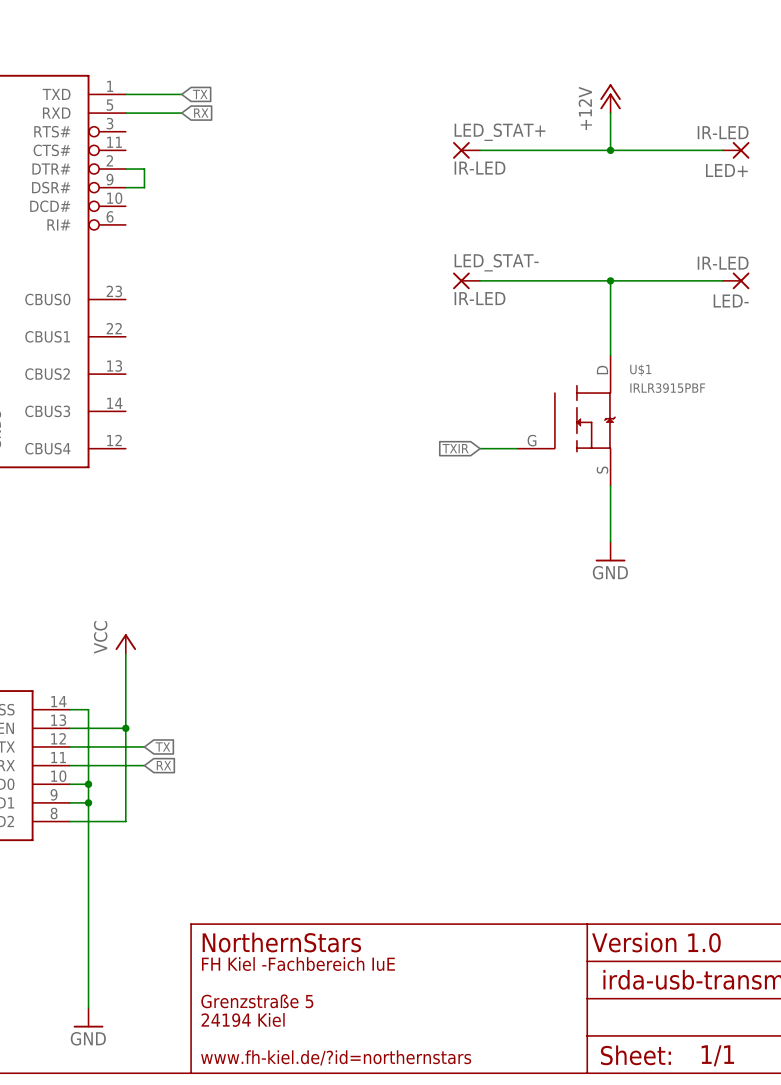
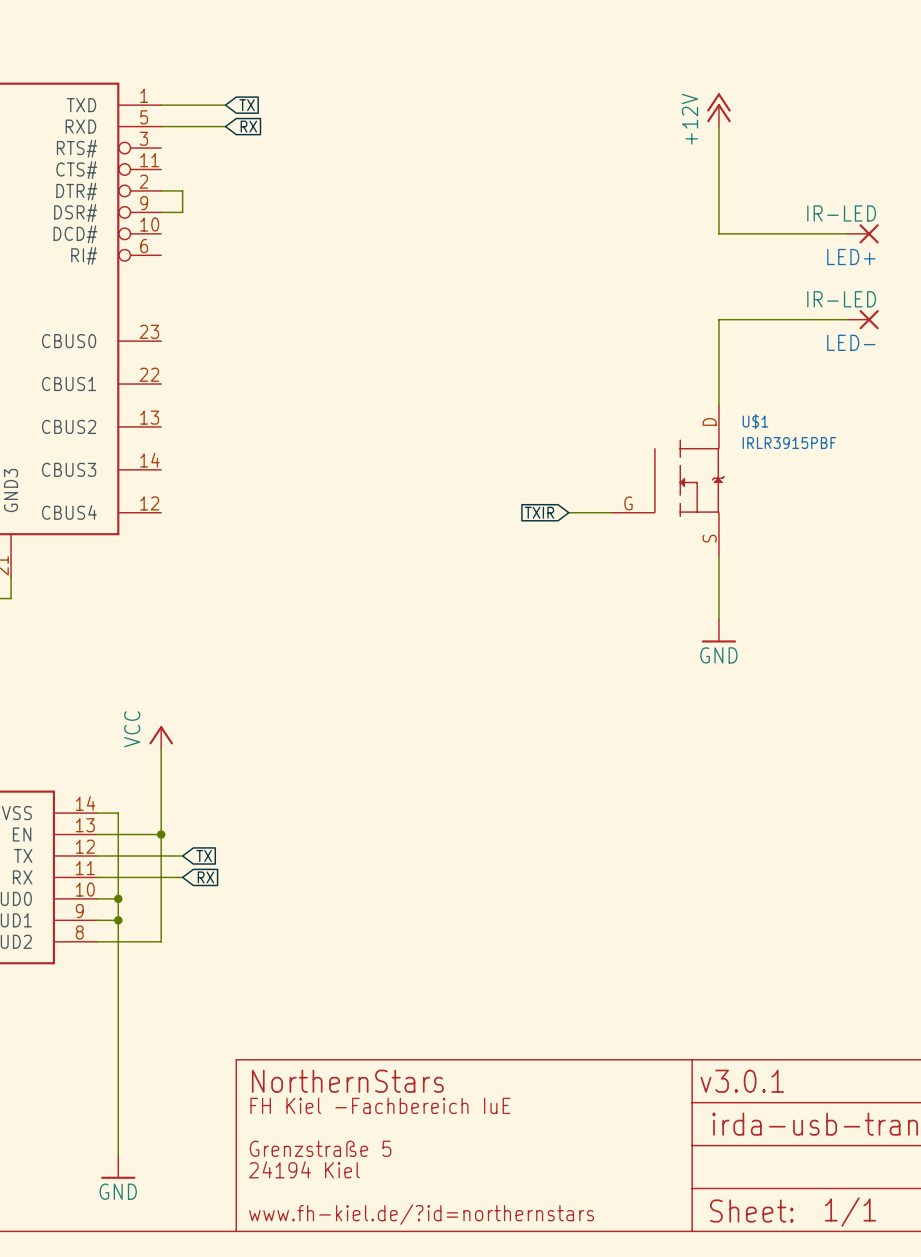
LED_STAT+: IR-LED (466, 150) -> none
wire: (480, 150) (722, 150) -> none
wire: none -> (718, 169) (718, 233) (847, 233)
junction: (610, 150) -> none
LED+ position: (735, 150) -> (863, 233)
LED_STAT-: IR-LED (466, 280) -> none
wire: (480, 280) (610, 280) -> none
junction: (610, 280) -> none
text: Version 1.0 (656, 942) -> v3.0.1 (742, 1081)

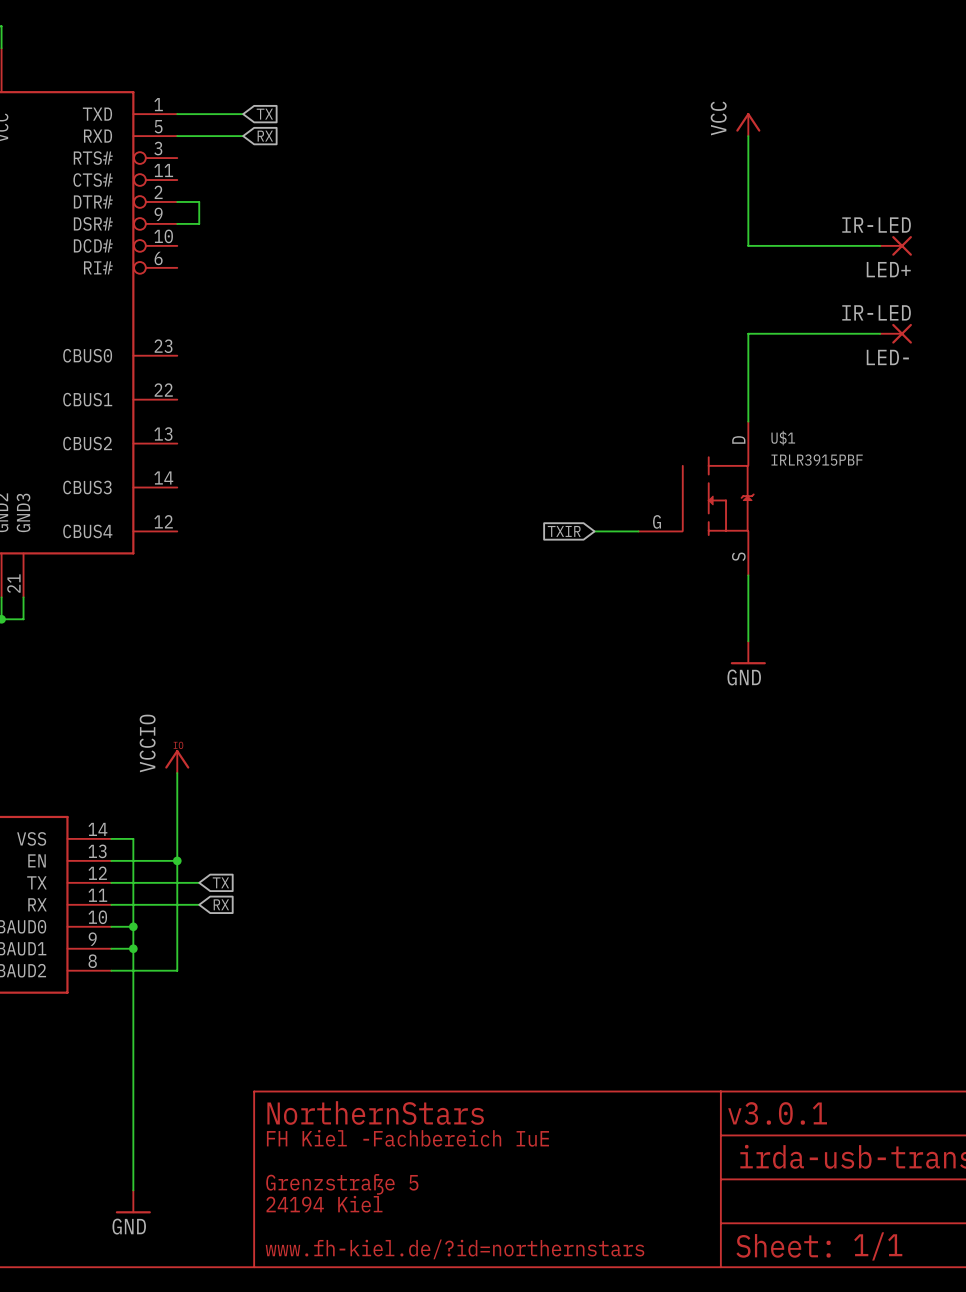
power symbol: +12V (718, 109) -> VCC (748, 124)
power symbol: VCC (161, 737) -> VCCIO (177, 761)

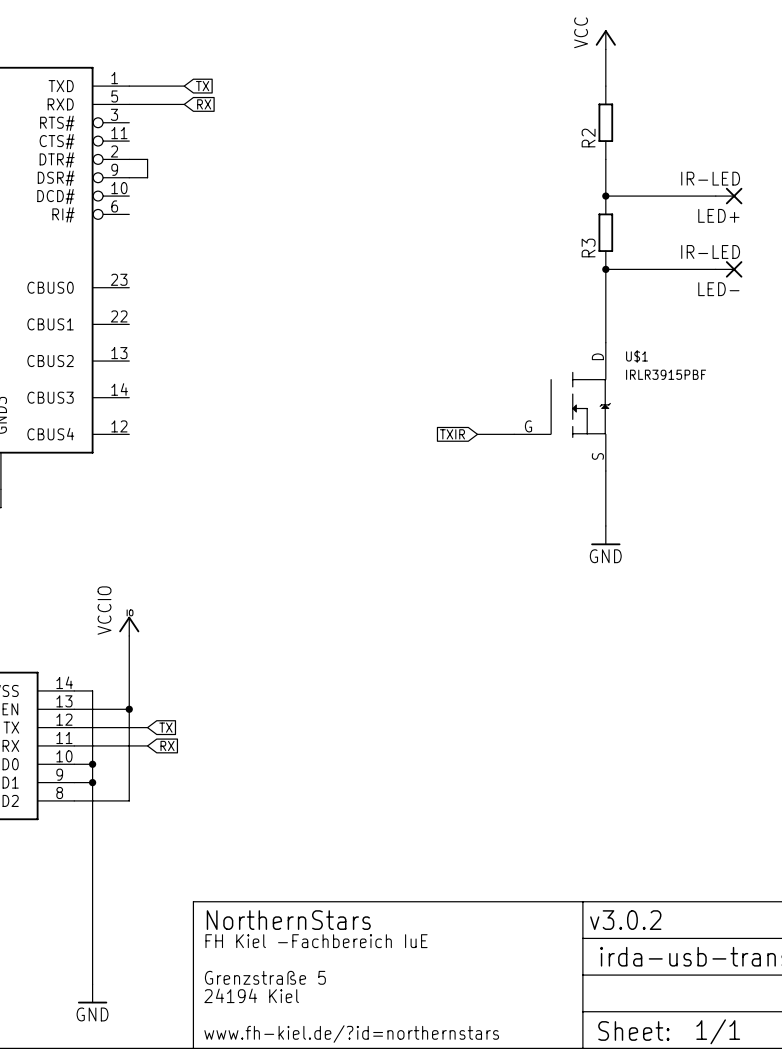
wire: none -> (605, 49) (605, 86)
power symbol position: VCC (748, 124) -> VCC (605, 39)
wire: (748, 136) (748, 201) -> none
R2: none -> (605, 122)
junction: none -> (605, 196)
R3: none -> (605, 232)
junction: none -> (605, 269)
text: v3.0.1 (777, 1113) -> v3.0.2 (625, 920)

